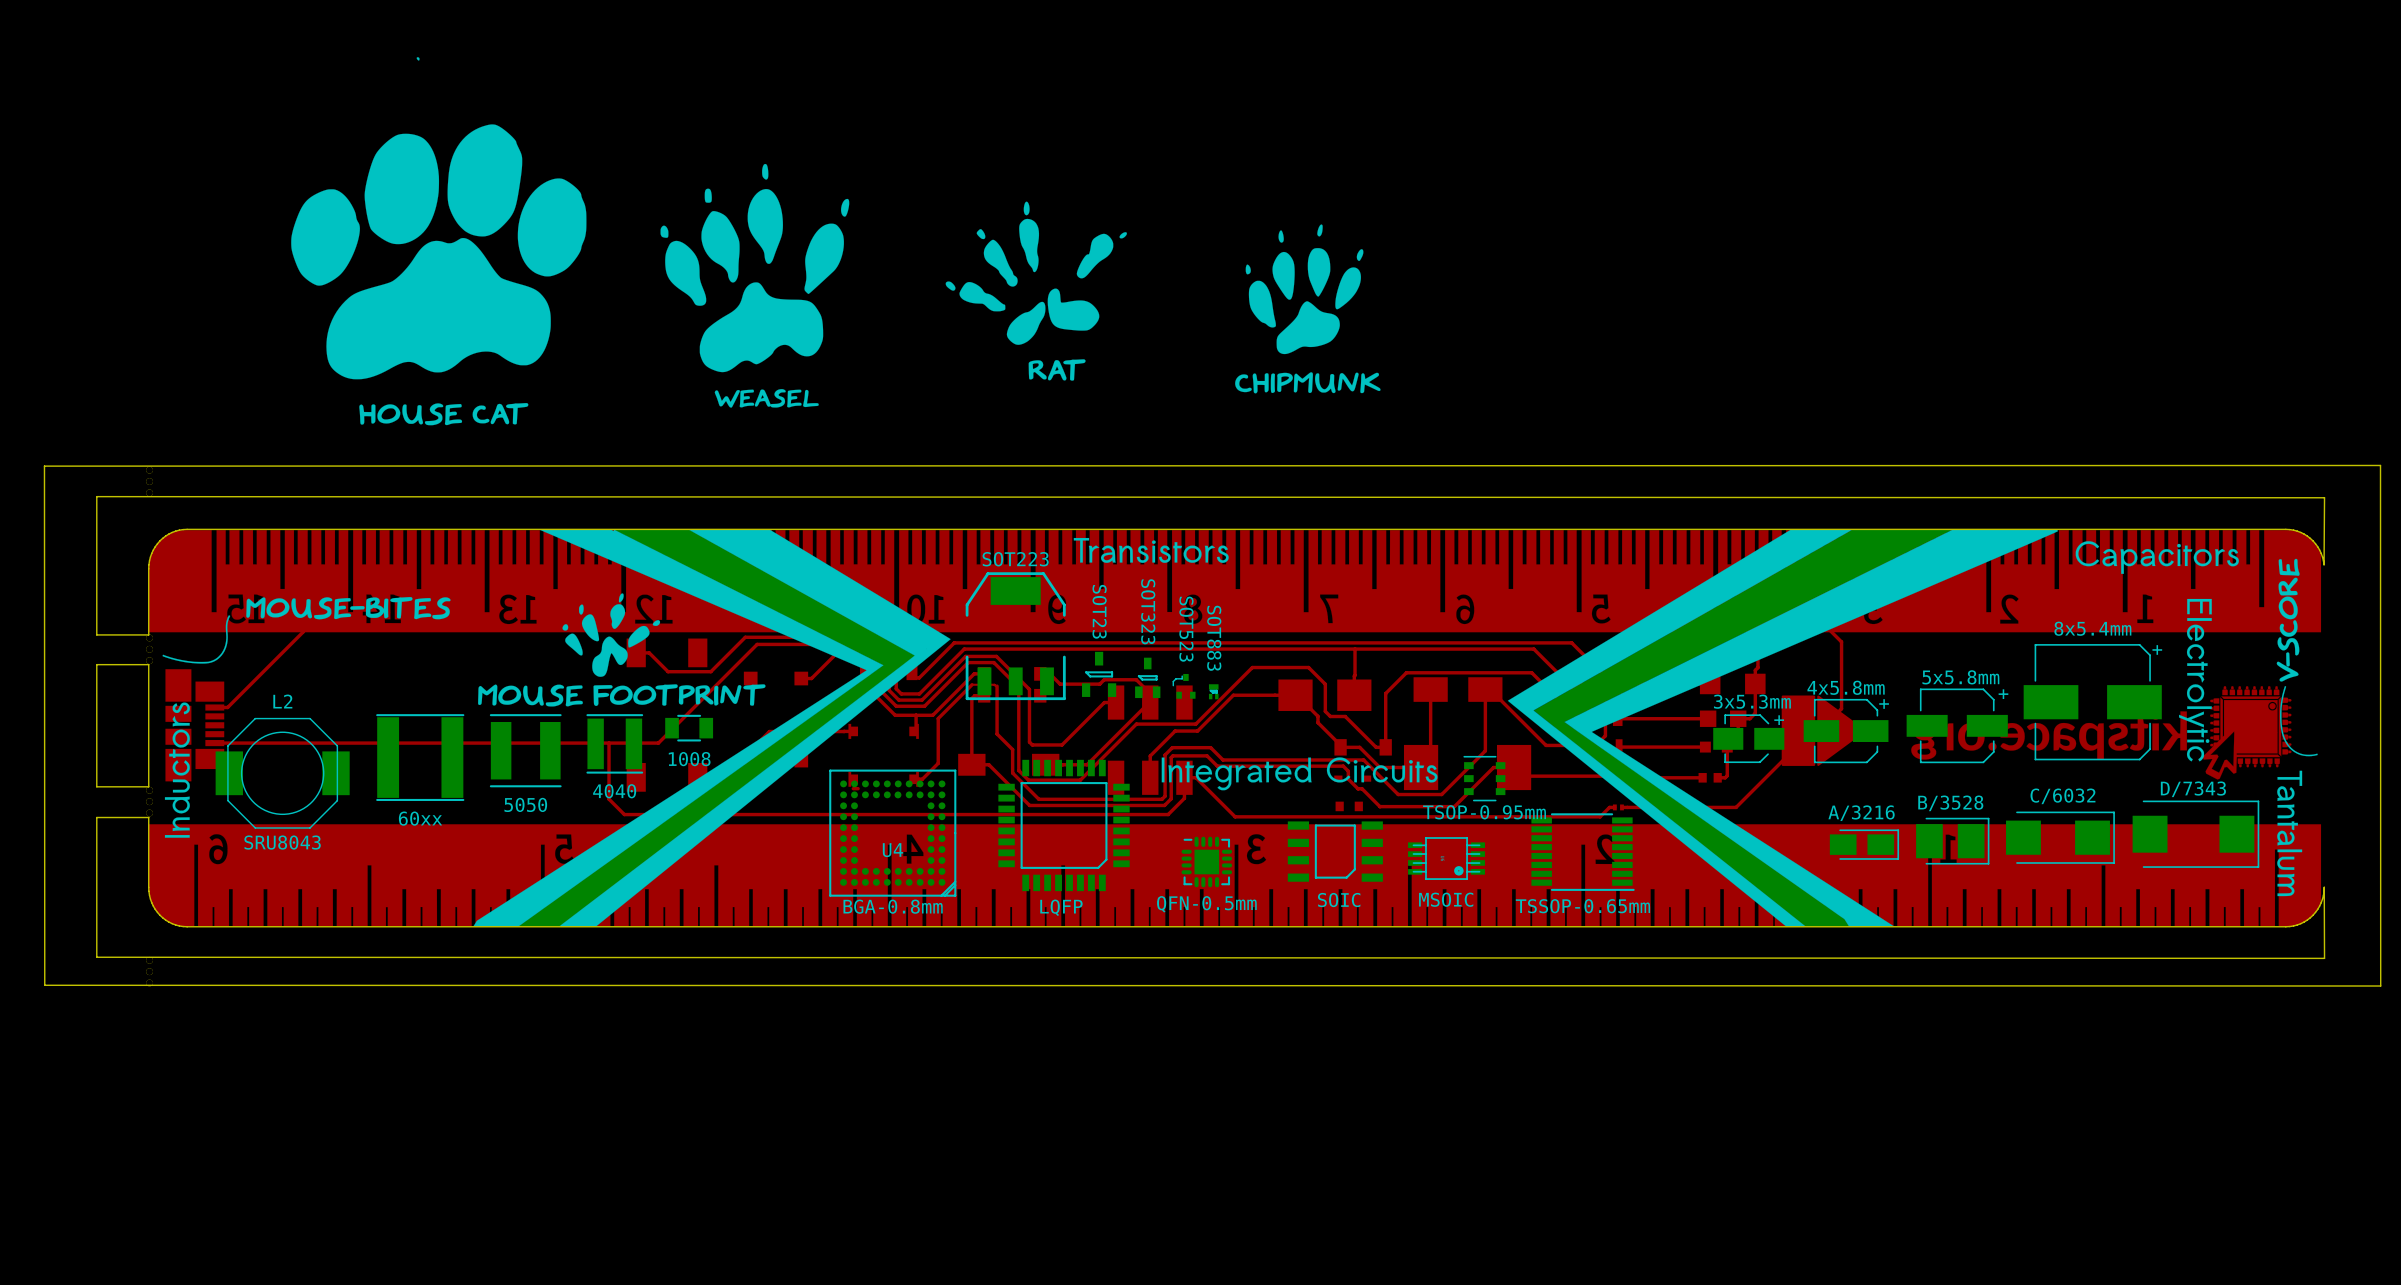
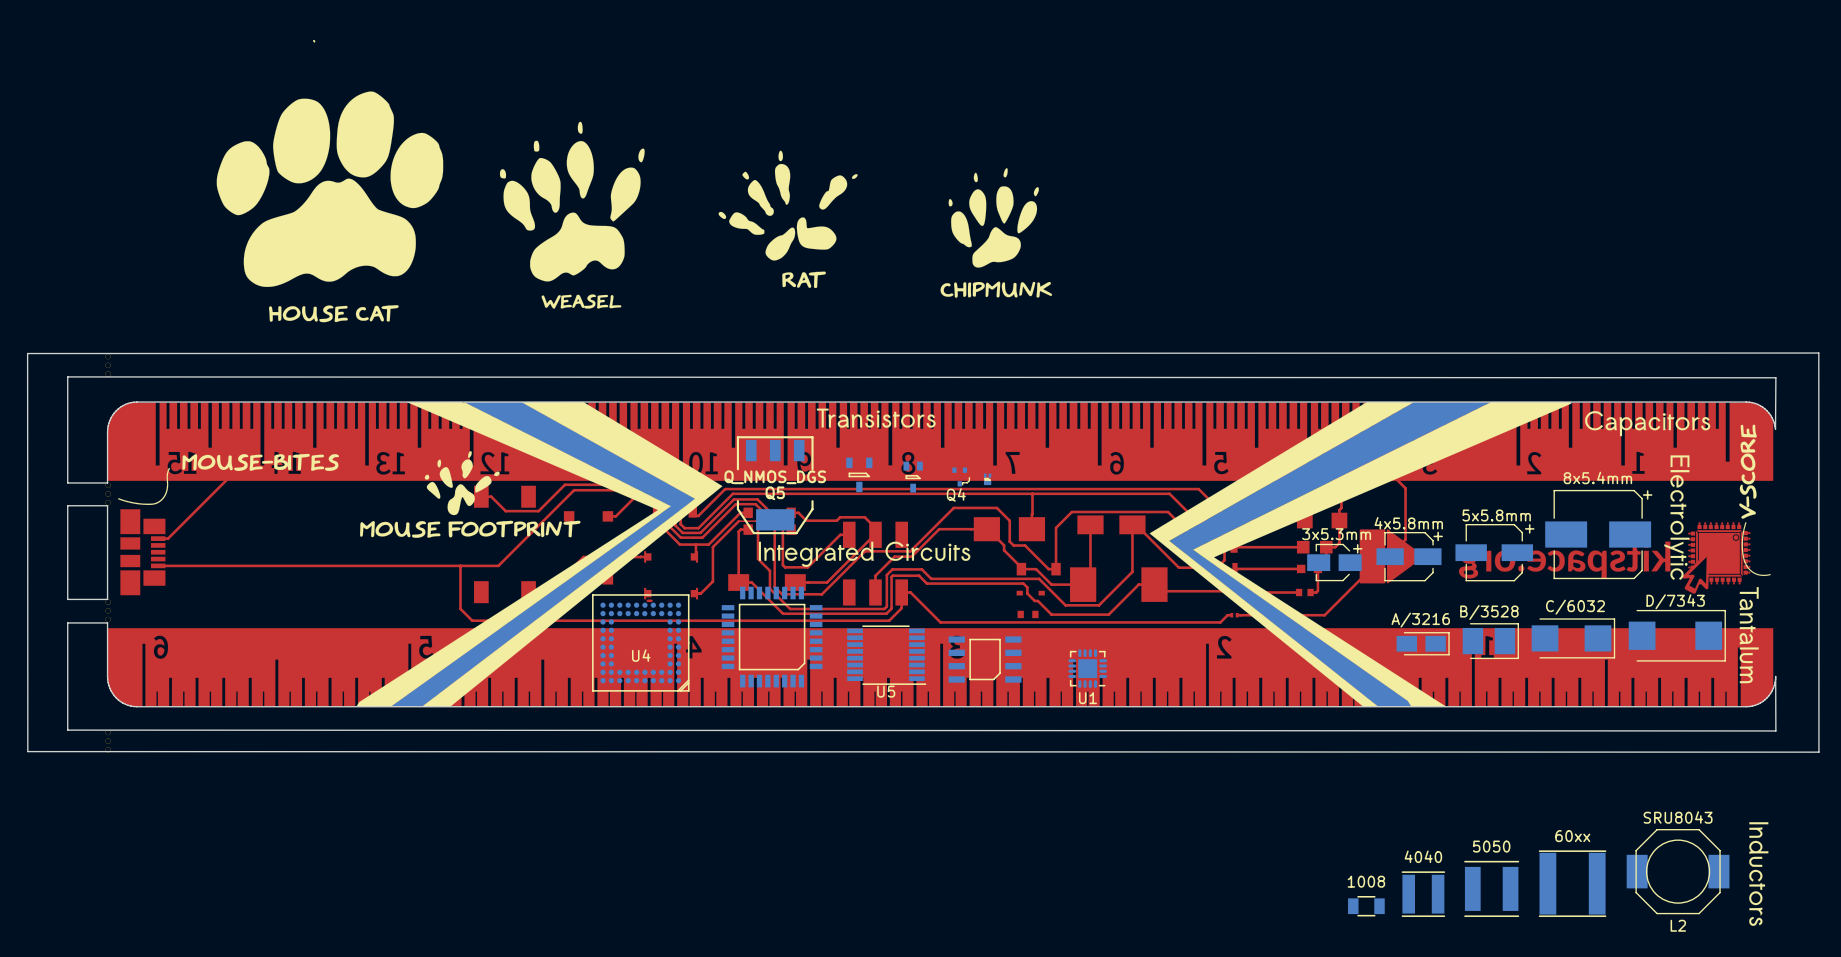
part: none -> (859, 474)
part: none -> (913, 477)
Q4: none -> (961, 477)
part: none -> (987, 479)
part: SOT223 (1015, 636) -> none
Q5: none -> Q_NMOS_DGS (775, 485)
part: SOT23 (1099, 674) -> none
part: SOT323 (1147, 677) -> none
part: SOT523 (1184, 686) -> none
part: SOT883 (1213, 691) -> none
L2 name position: L2 (282, 701) -> L2 (1678, 925)
drawing: [164, 702, 190, 838] -> none
part: 1008 (689, 728) -> none
part: 4040 (614, 743) -> none
part: 5050 (525, 750) -> none
part: 60xx (420, 757) -> none
L2 position: (282, 773) -> (1678, 871)
drawing position: (1299, 773) -> (864, 554)
part: TSOP-0.95mm (1484, 778) -> none
part: LQFP (1064, 825) -> none
U4 position: (892, 833) -> (640, 642)
part: none -> (772, 637)
L2 value position: SRU8043 (282, 842) -> SRU8043 (1678, 817)
part: SOIC (1335, 851) -> none
part: TSSOP-0.65mm (1583, 852) -> none
part: MSOIC (1446, 858) -> none
U5: none -> (886, 655)
part: QFN-0.5mm (1206, 862) -> none
part: none -> (985, 659)
U1: none -> (1087, 668)
U4 value: BGA-0.8mm (893, 906) -> none
drawing: none -> [1749, 822, 1769, 926]
part: none -> 60xx (1572, 883)
part: none -> 5050 (1491, 888)
part: none -> 4040 (1423, 894)
part: none -> 1008 (1366, 906)

